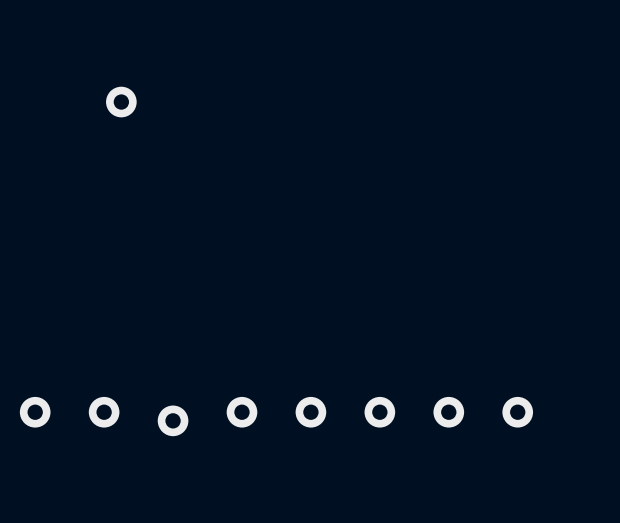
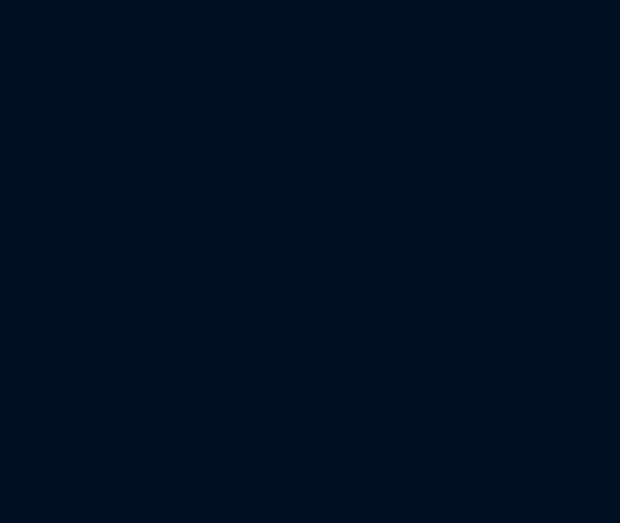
via: (121, 102) -> none
via: (35, 412) -> none
via: (104, 412) -> none
via: (241, 412) -> none
via: (310, 412) -> none
via: (379, 412) -> none
via: (448, 412) -> none
via: (517, 412) -> none
via: (173, 420) -> none

